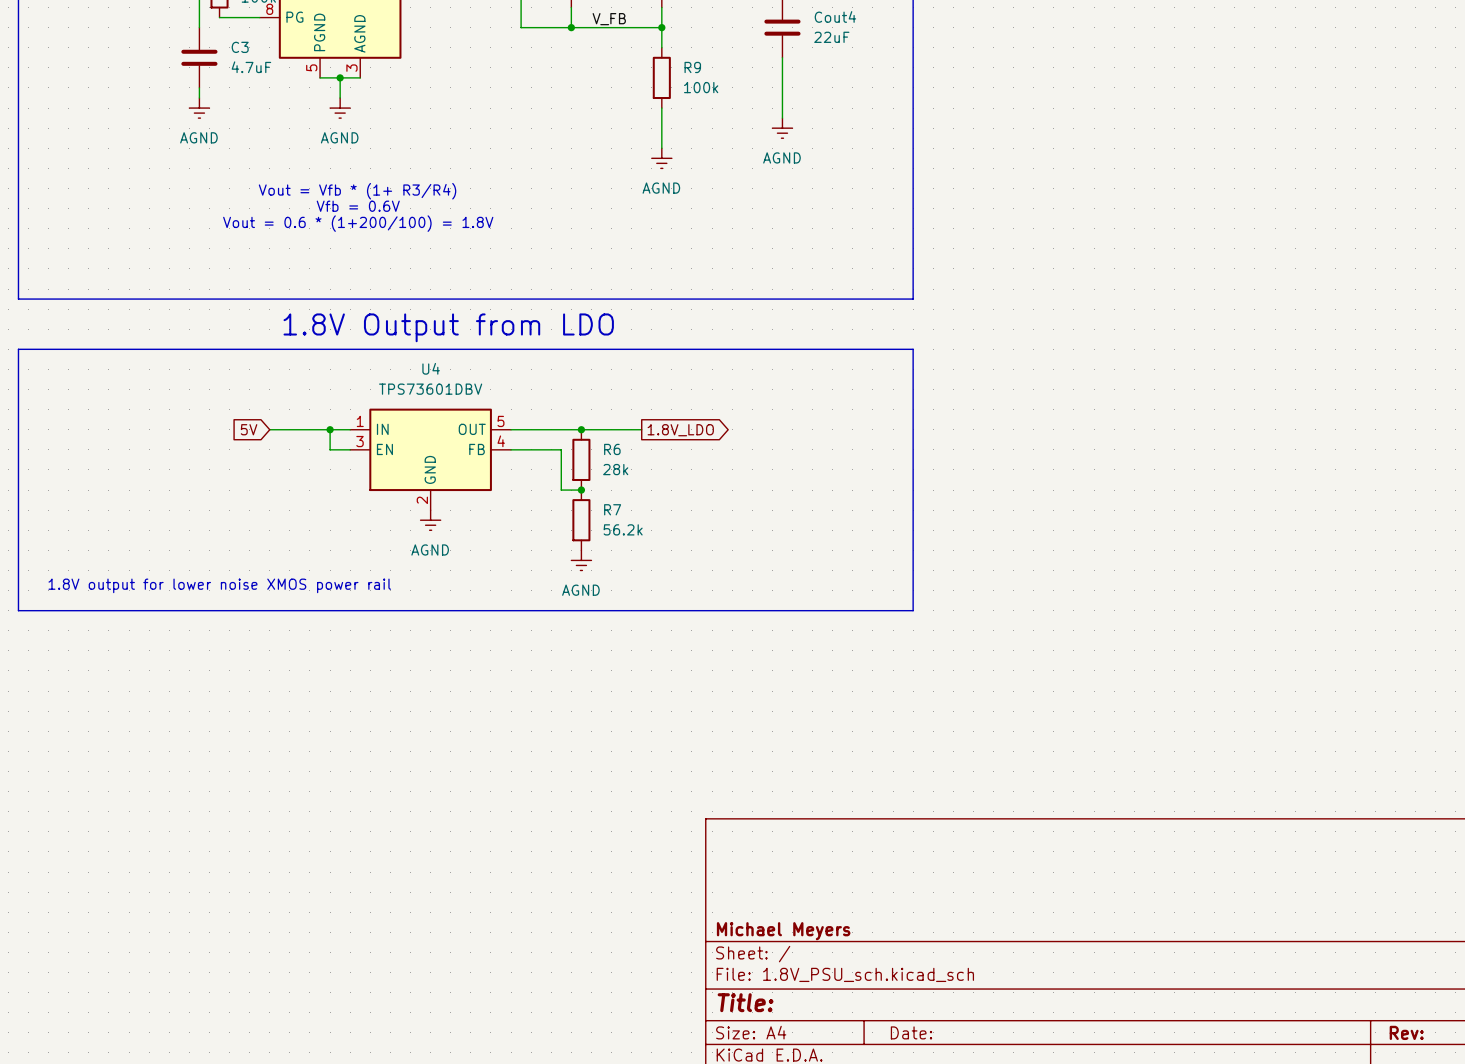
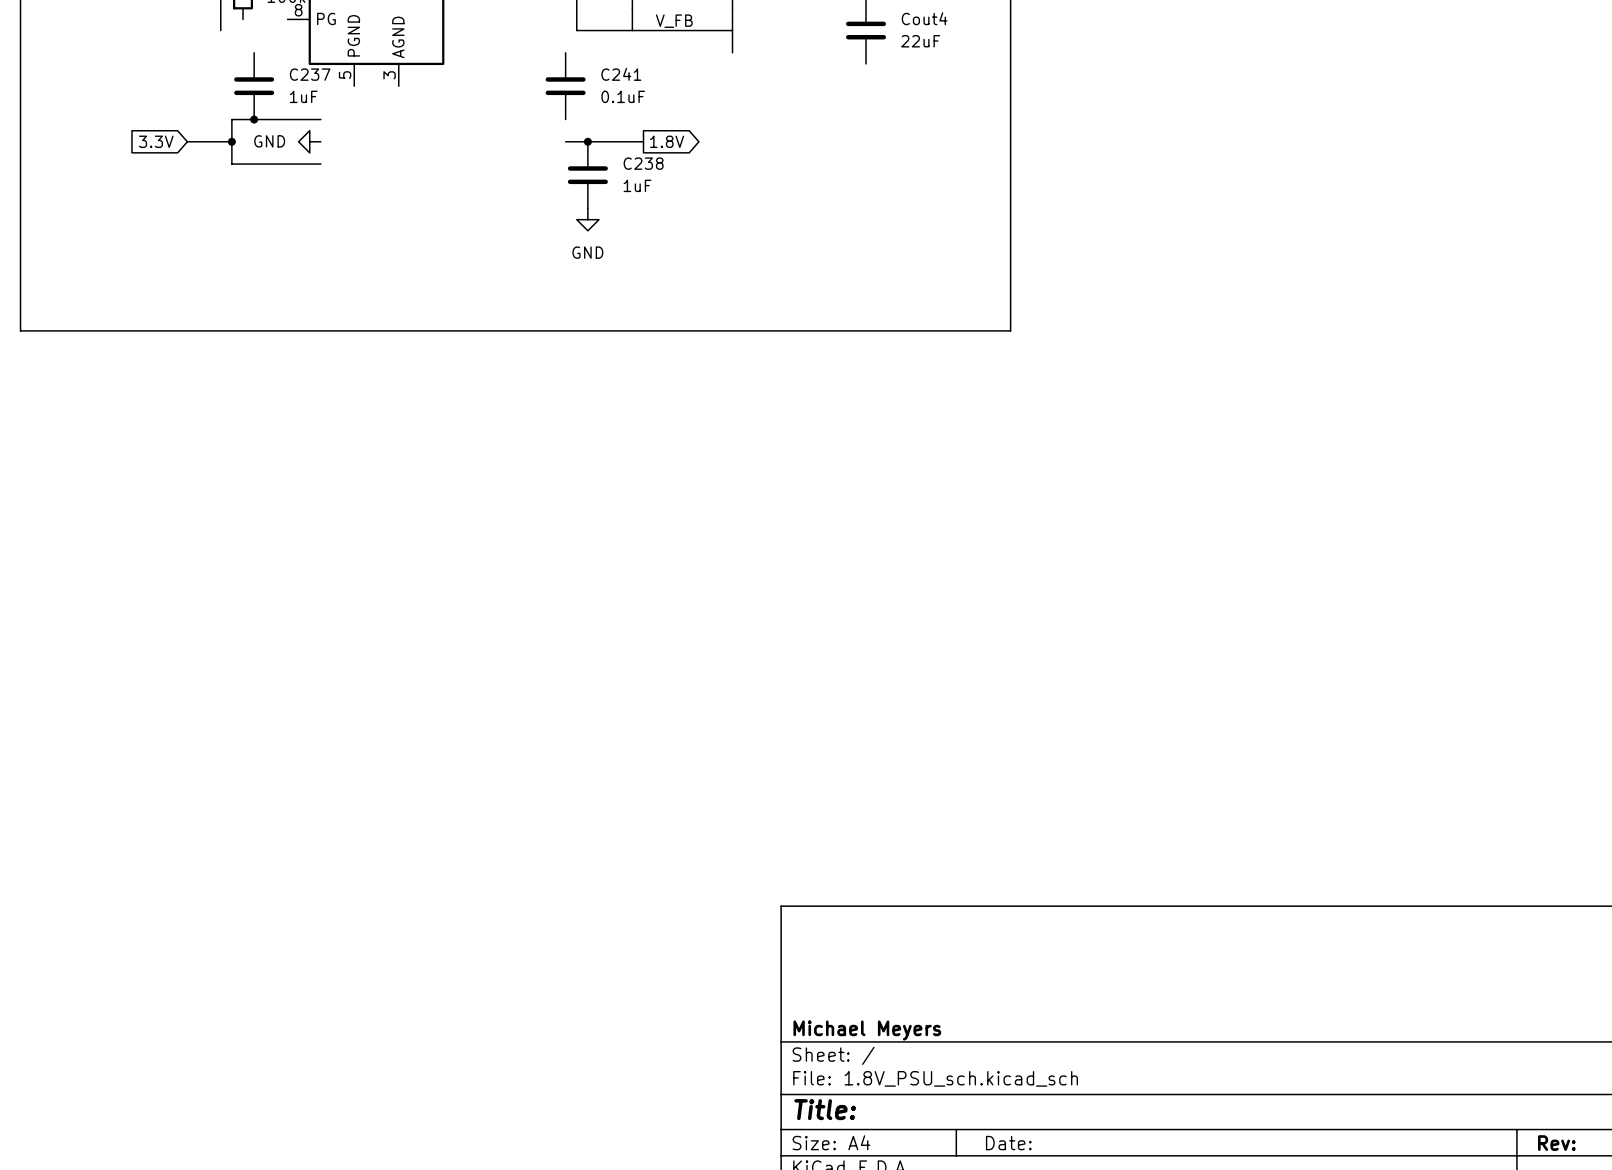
wire: (219, 17) (259, 17) -> (187, 141) (231, 141)
junction: (571, 27) -> none
junction: (661, 27) -> none
C3: 4.7uF (199, 57) -> none
wire: (782, 57) (782, 118) -> none
C237: none -> 1uF (254, 86)
wire: (320, 77) (360, 77) -> none
wire: (340, 77) (340, 98) -> none
junction: (340, 77) -> none
C241: none -> 0.1uF (565, 86)
R9: 100k (661, 77) -> none
wire: (199, 87) (199, 98) -> none
power symbol: AGND (199, 108) -> none
junction: none -> (254, 119)
wire: none -> (320, 119) (231, 119) (231, 164) (320, 164)
power symbol: AGND (340, 108) -> none
wire: (661, 108) (661, 148) -> none
global label: none -> 3.3V (156, 141)
junction: none -> (231, 141)
power symbol: none -> GND (309, 141)
wire: none -> (565, 141) (643, 141)
junction: none -> (587, 141)
global label: none -> 1.8V (667, 141)
power symbol: AGND (782, 128) -> none
C238: none -> 1uF (587, 175)
power symbol: AGND (661, 158) -> none
text: Vout = Vfb * (1+ R3/R4) (357, 191) -> none
power symbol: none -> GND (587, 219)
text: Vfb = 0.6V (358, 206) -> none
text: Vout = 0.6 * (1+200/100) = 1.8V (358, 223) -> none
text: 1.8V Output from LDO (448, 327) -> none
line: (18, 349) (913, 349) (913, 610) (18, 610) (18, 349) -> none
global label: 5V (249, 429) -> none
wire: (269, 429) (350, 429) -> none
wire: (330, 429) (330, 449) (350, 449) -> none
junction: (330, 429) -> none
wire: (511, 429) (641, 429) -> none
junction: (581, 429) -> none
global label: 1.8V_LDO (680, 430) -> none
wire: (511, 449) (561, 449) (561, 490) (581, 490) -> none
U4: TPS73601DBV (430, 459) -> none
R6: 28k (581, 459) -> none
junction: (581, 490) -> none
power symbol: AGND (430, 520) -> none
R7: 56.2k (581, 520) -> none
power symbol: AGND (581, 560) -> none
text: 1.8V output for lower noise XMOS power rail (219, 585) -> none

